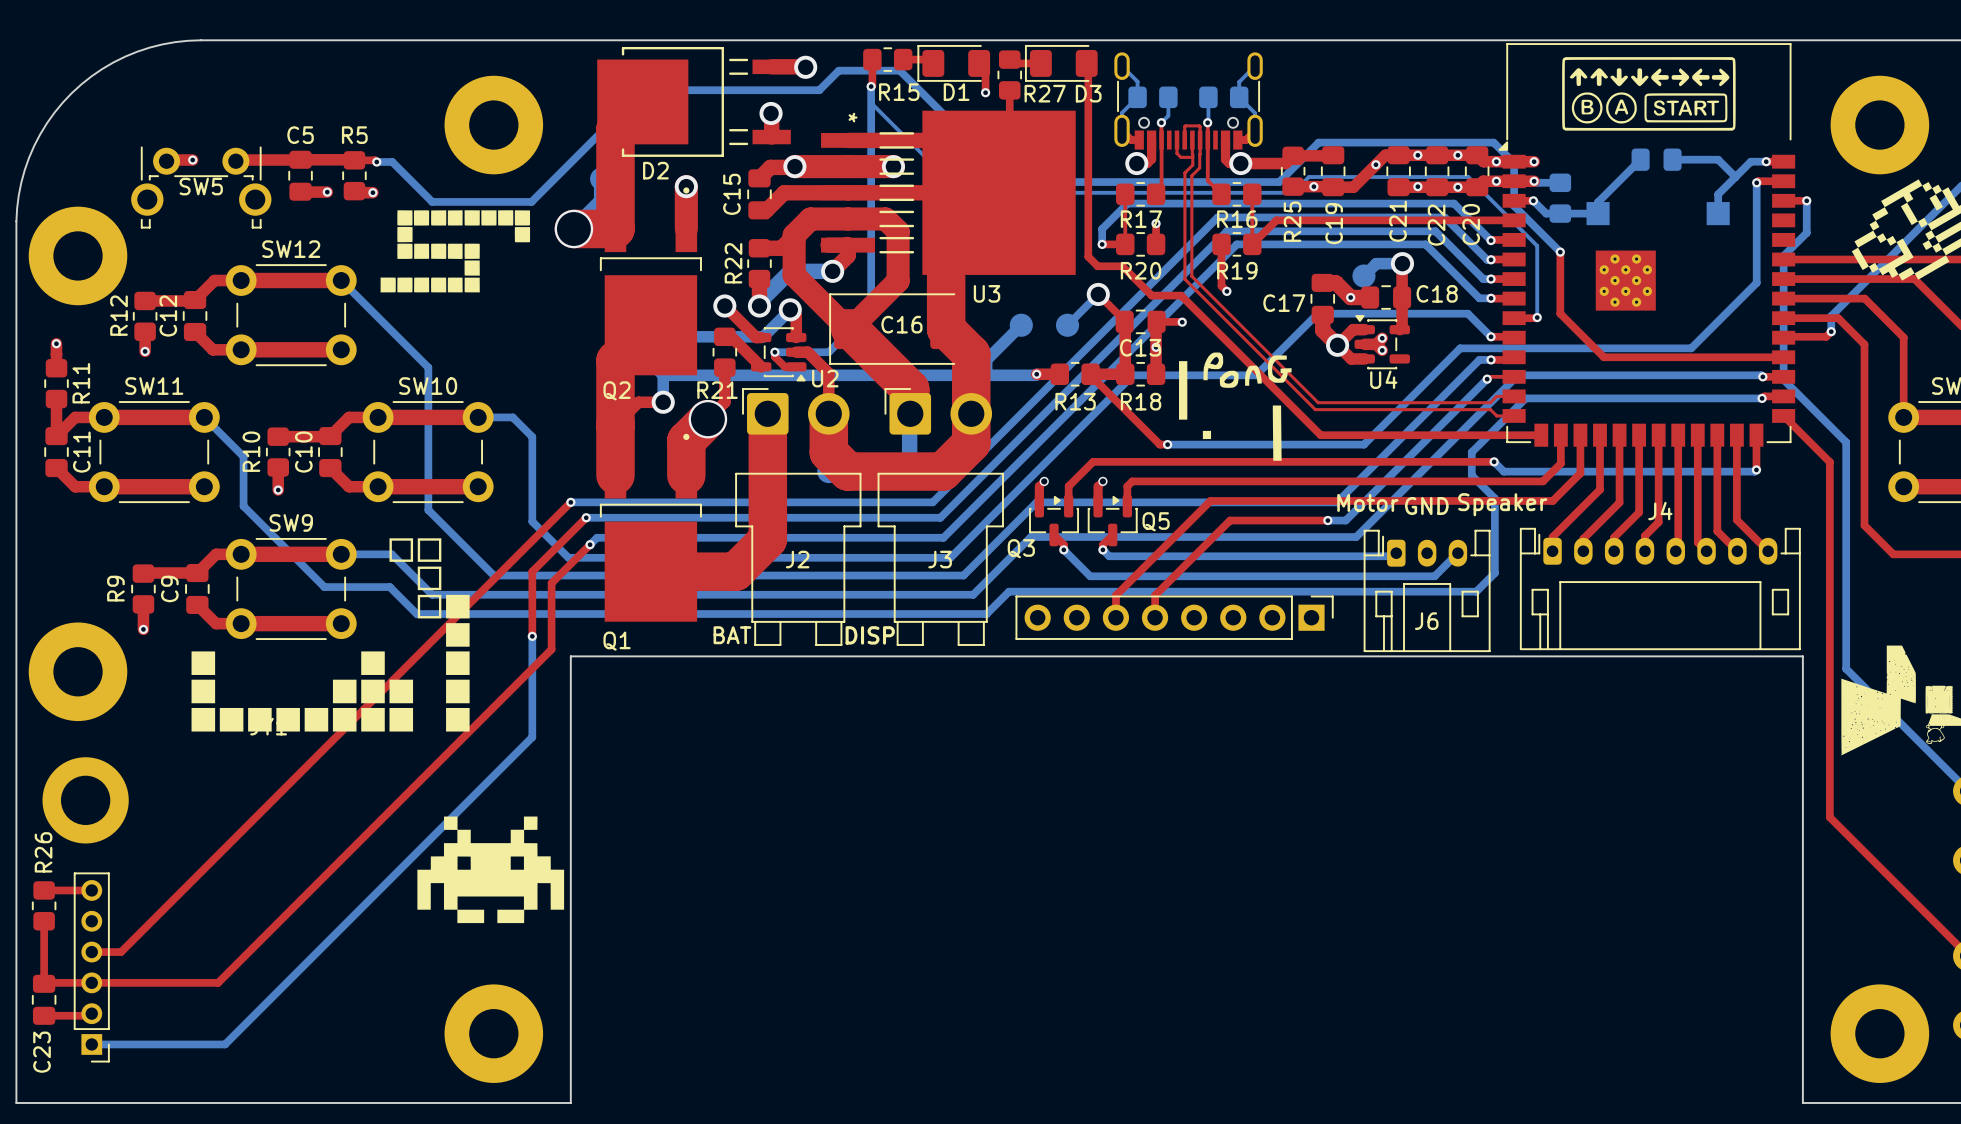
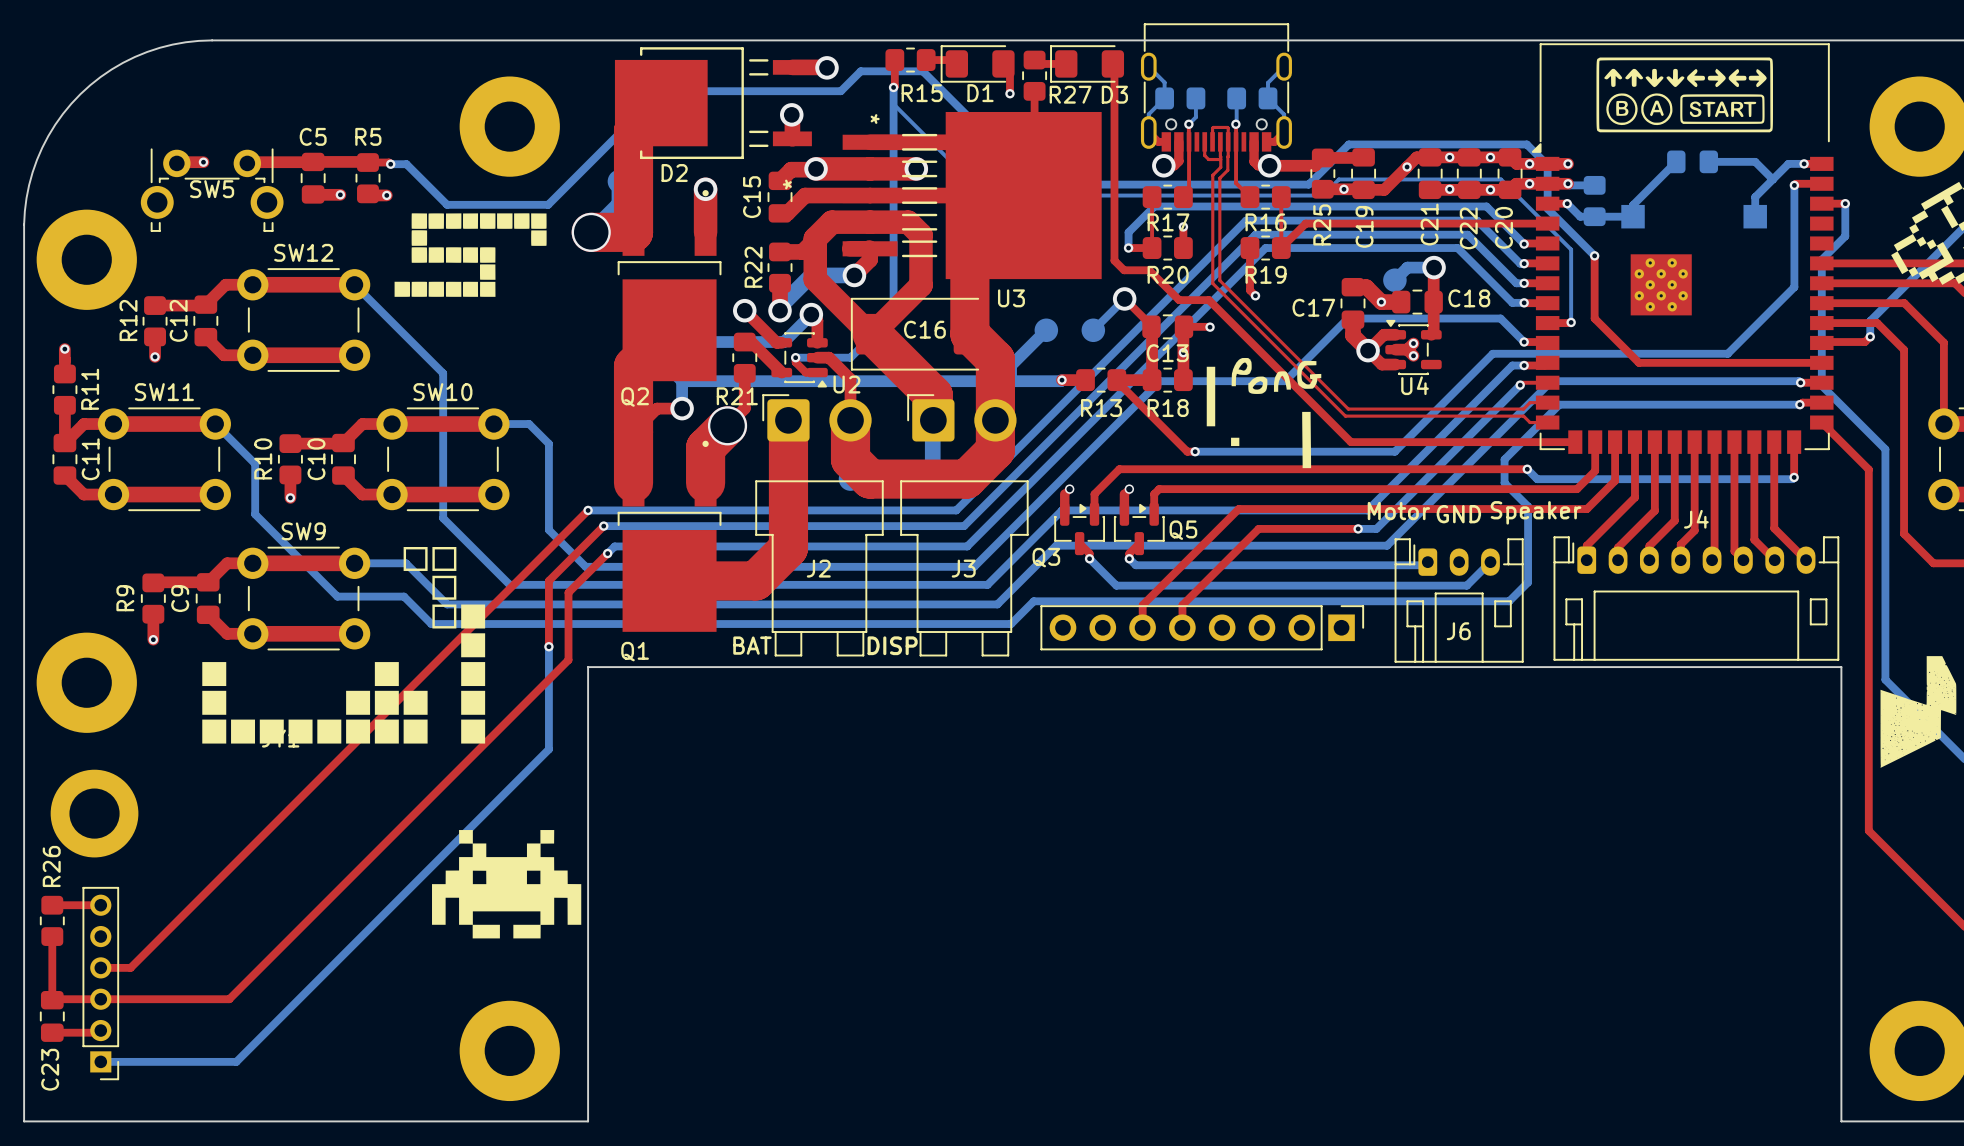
part footprint: [1114, 52, 1263, 150] -> [1140, 23, 1292, 152]
D2 text: none -> * (787, 184)

